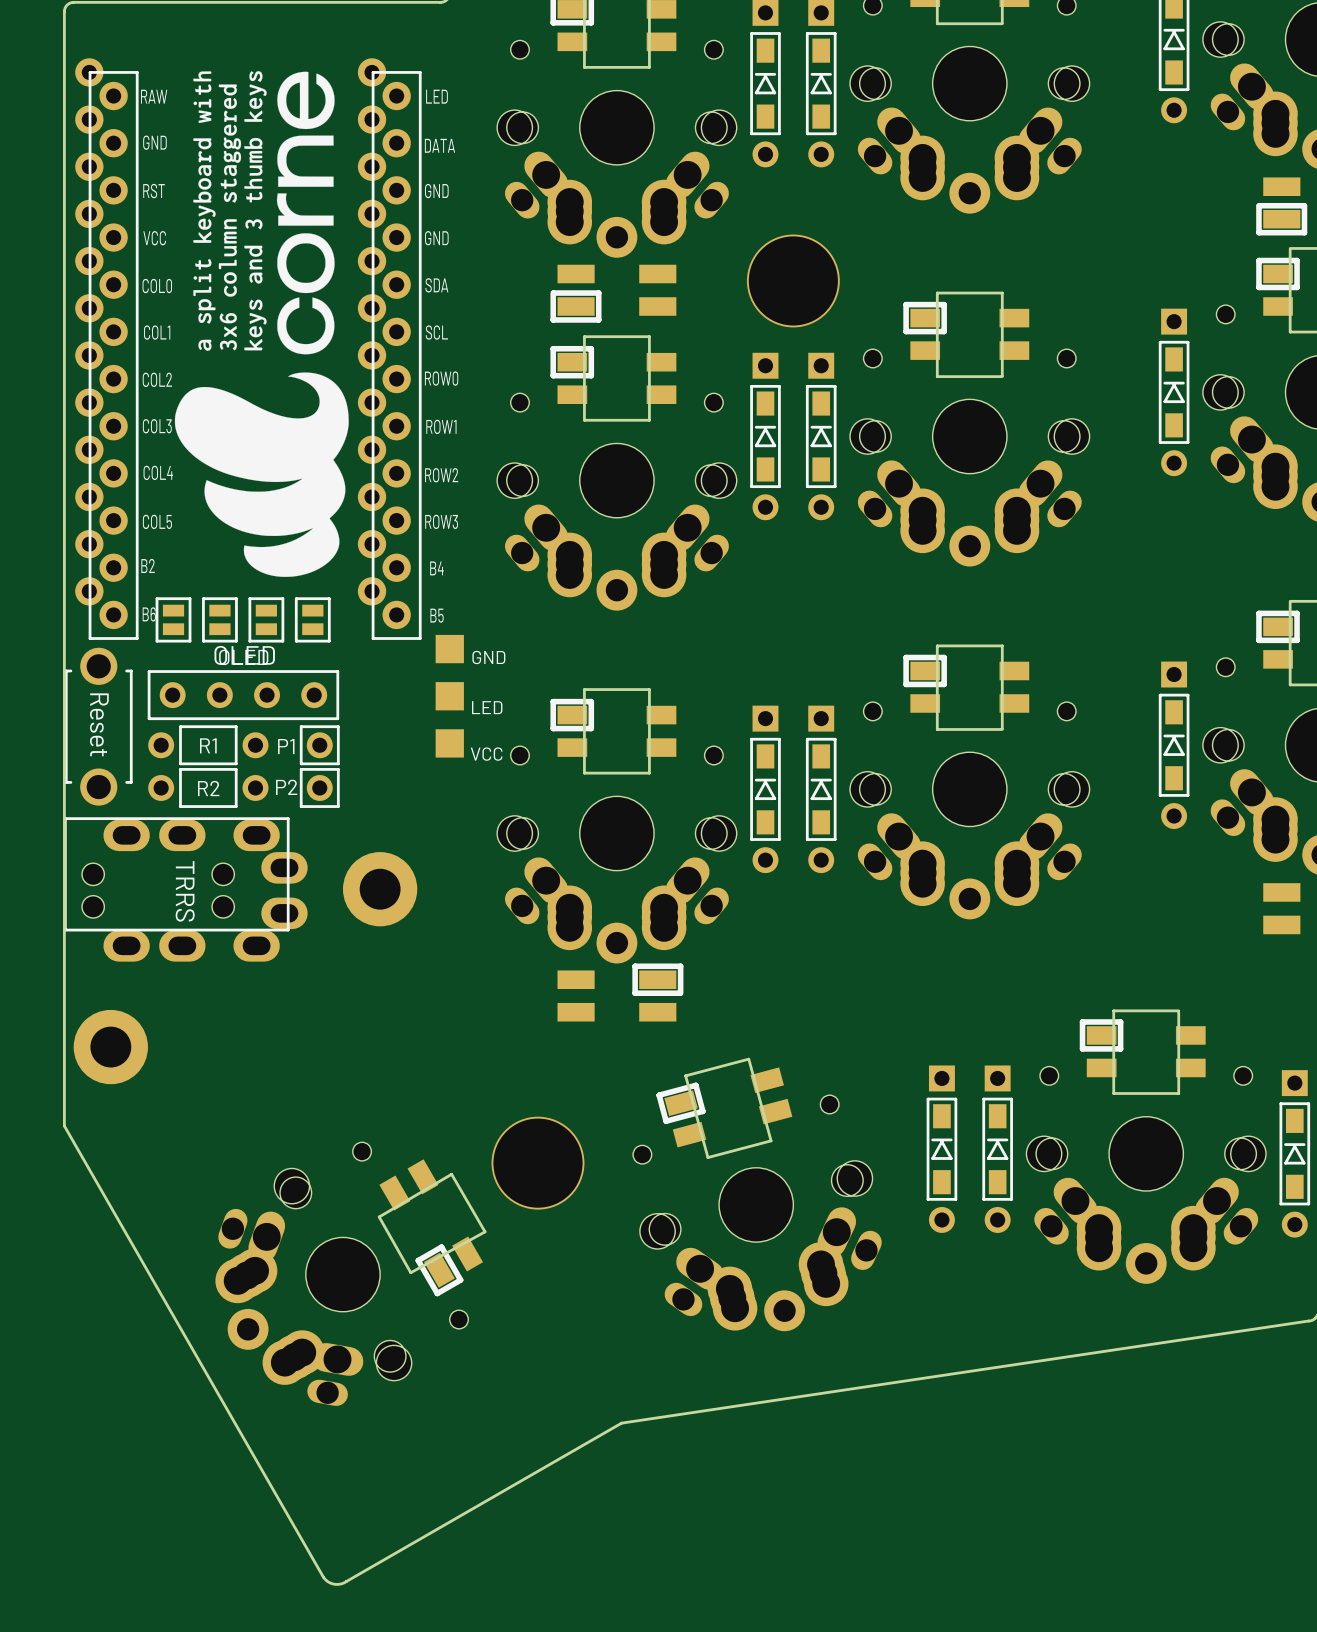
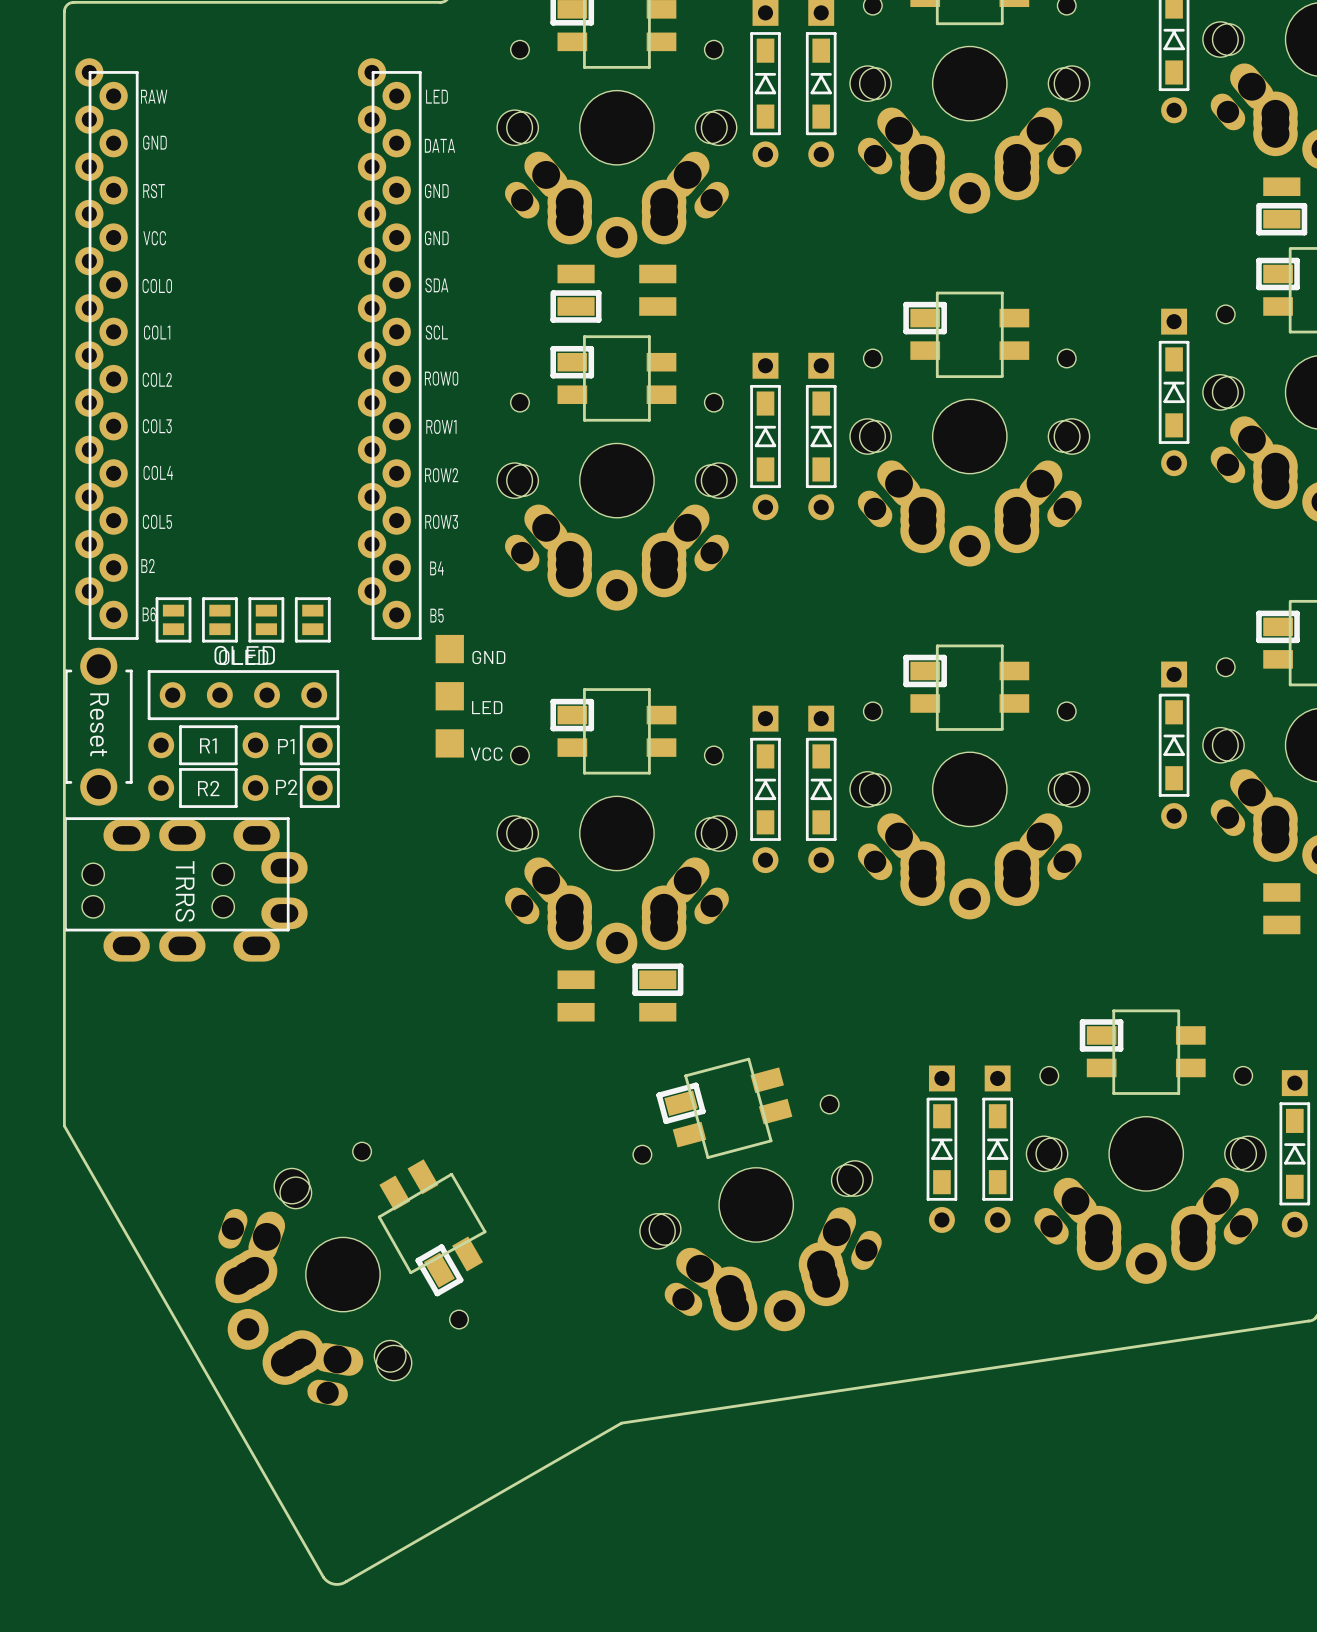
drawing: [174, 71, 349, 577] -> none
part: (793, 280) -> none
part: (380, 889) -> none
part: (110, 1047) -> none
part: (537, 1163) -> none

